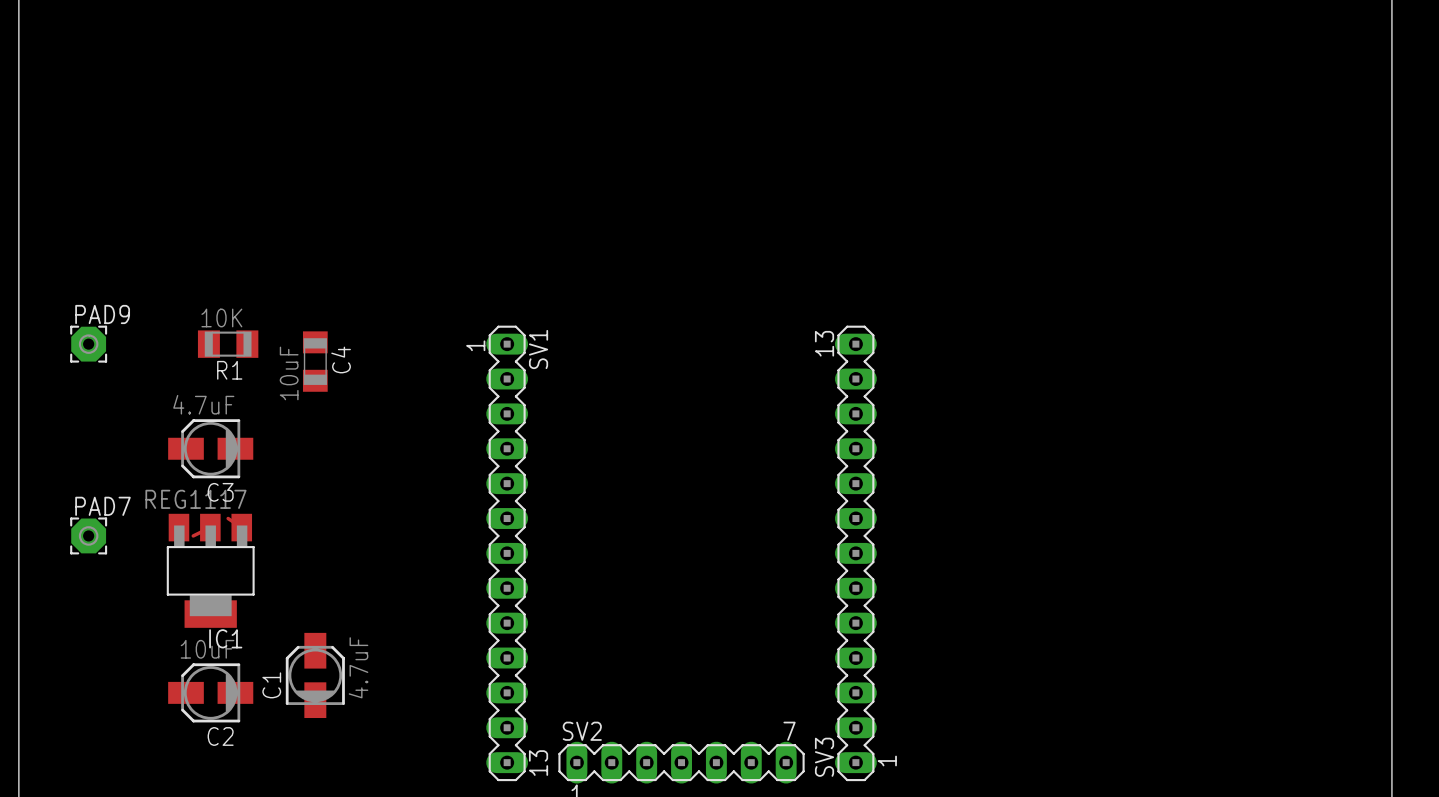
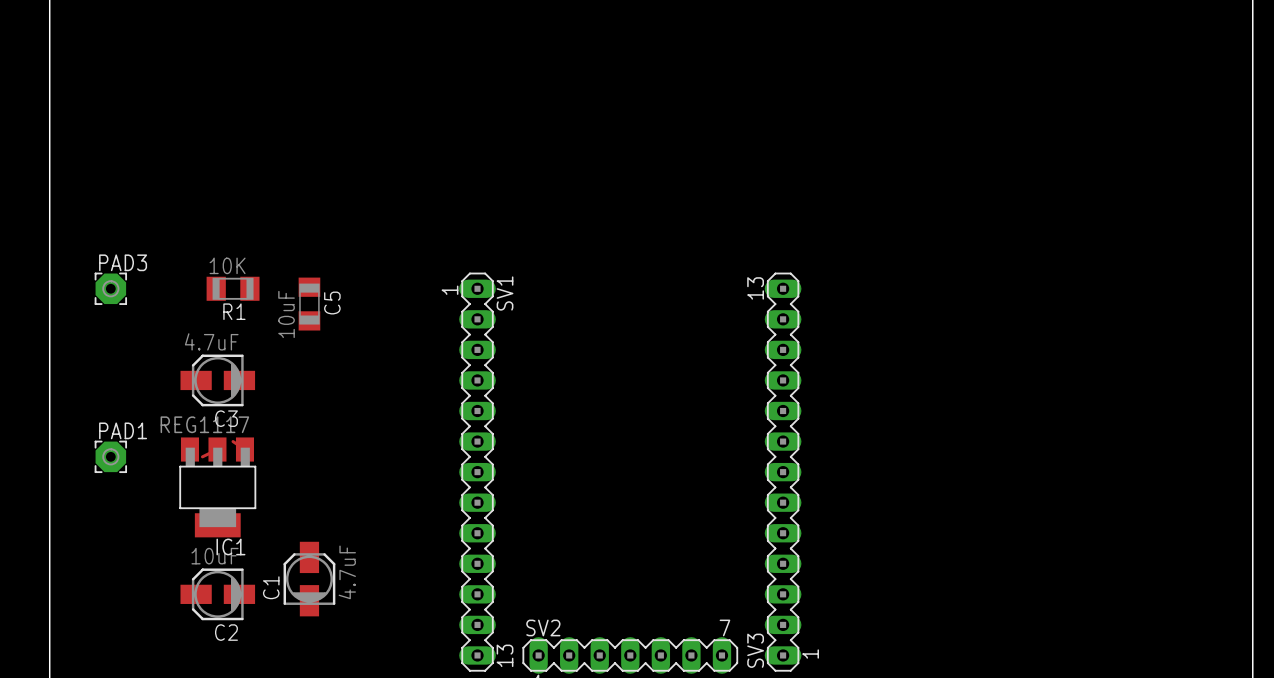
PAD9 name: PAD9 (102, 314) -> PAD3 (123, 262)
C4 name: C4 (341, 359) -> C5 (332, 303)
PAD7 name: PAD7 (102, 506) -> PAD1 (123, 430)

